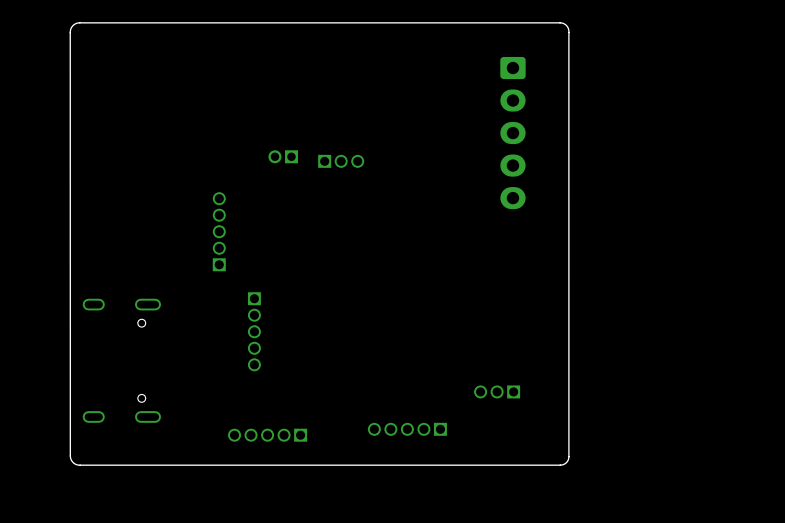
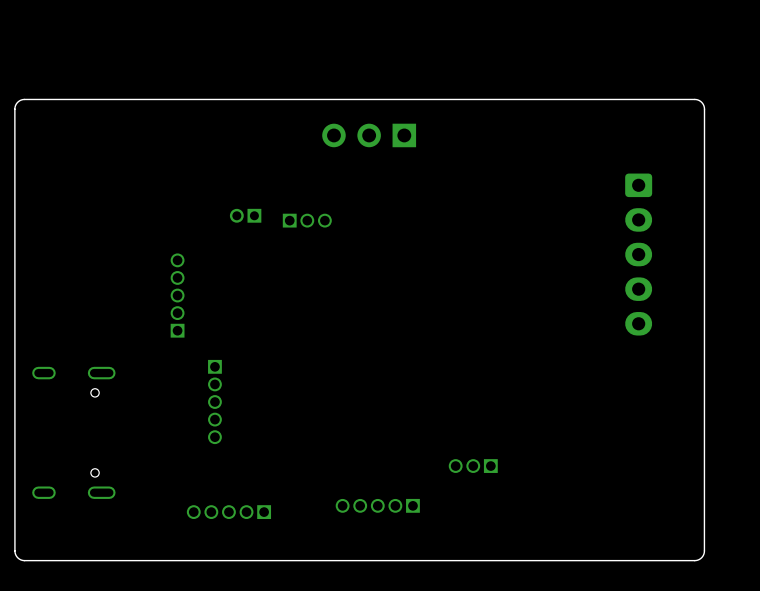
board edge: (79, 22) (72, 25) (70, 32) (70, 455) (73, 462) (80, 465) (560, 465) -> none
board edge: (79, 22) (560, 22) (565, 24) (568, 31) (568, 456) (566, 462) (560, 465) -> none
board edge: none -> (694, 99) (19, 100) (14, 109) (16, 556) (24, 560) (699, 559) (704, 550) (704, 109) (701, 102) (694, 99)
part: none -> (369, 135)
part position: (512, 133) -> (638, 254)

